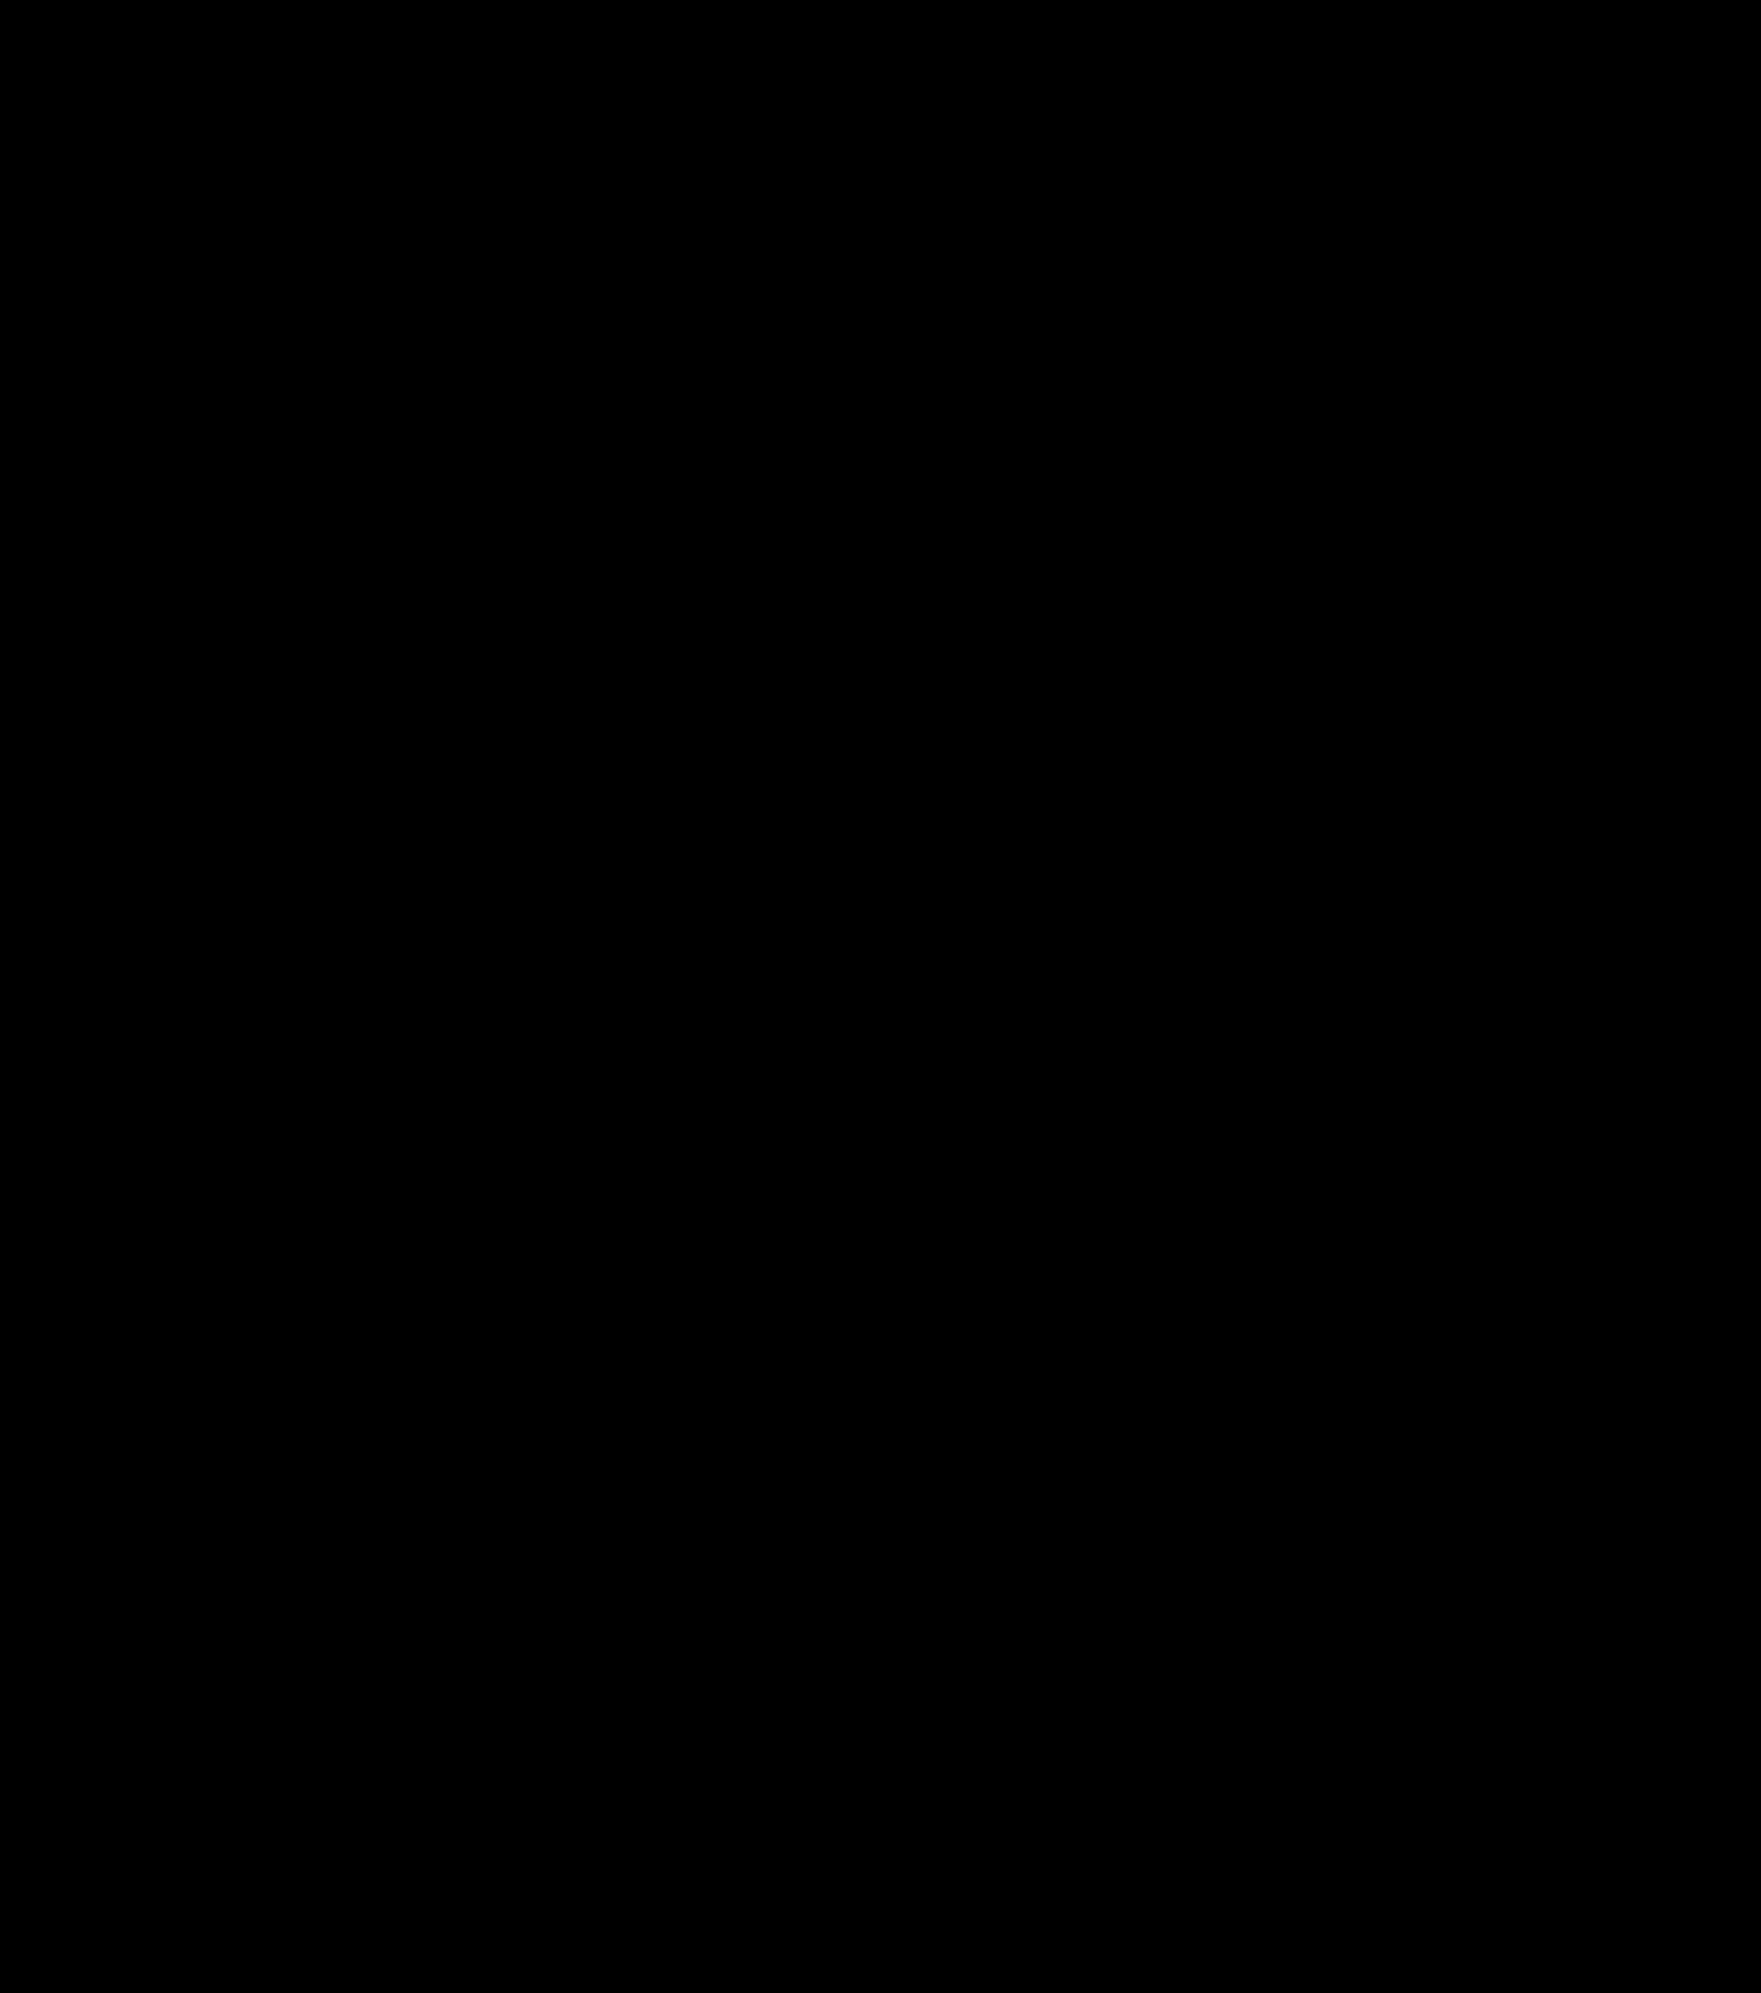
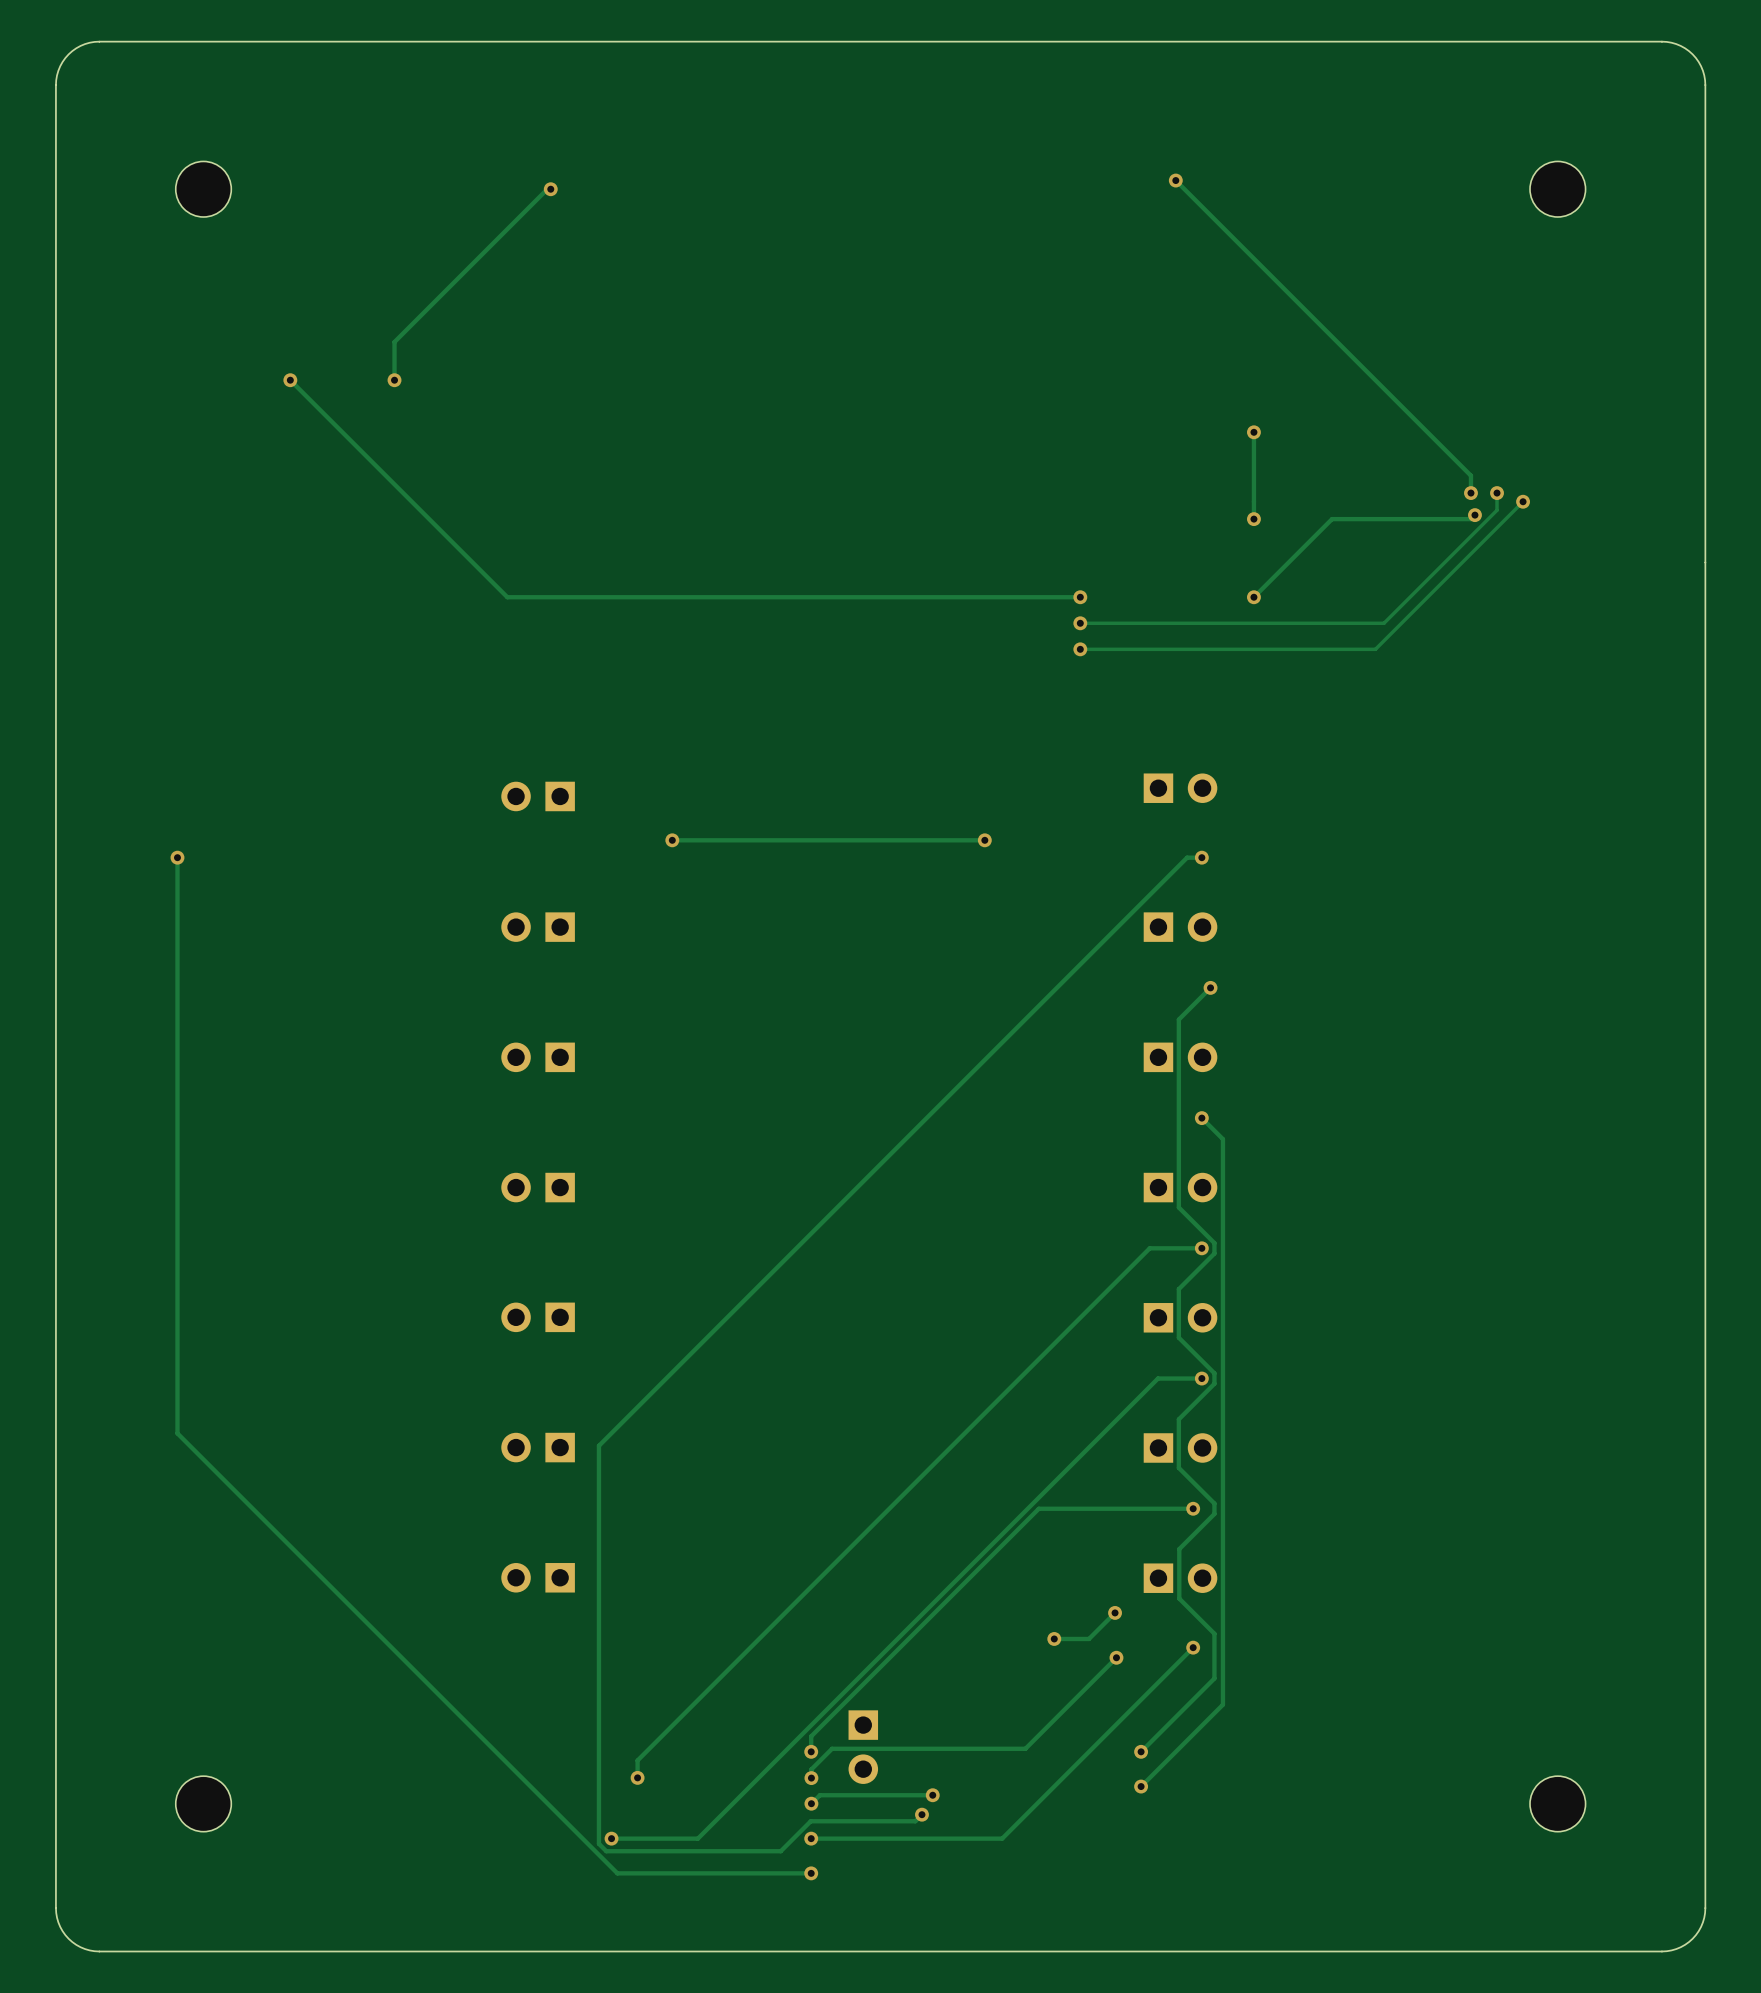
board edge: none -> (1661, 41) (99, 41) (80, 45) (65, 57) (58, 70) (55, 85) (55, 1908) (60, 1926) (72, 1942) (85, 1949) (99, 1951) (1661, 1951) (1680, 1947) (1695, 1935) (1702, 1922) (1705, 1908) (1705, 85) (1702, 70) (1692, 54) (1676, 44) (1661, 41)
track: none -> (1175, 180) (1470, 475) (1470, 493)
via: none -> (1175, 180)
part: none -> (203, 189)
track: none -> (550, 189) (547, 189) (394, 342) (394, 380)
via: none -> (550, 189)
part: none -> (1557, 189)
track: none -> (290, 380) (507, 597) (1080, 597)
via: none -> (290, 380)
via: none -> (394, 380)
track: none -> (1253, 432) (1253, 519)
via: none -> (1253, 432)
via: none -> (1470, 493)
track: none -> (1497, 493) (1497, 510) (1383, 623) (1080, 623)
via: none -> (1497, 493)
track: none -> (1523, 501) (1375, 649) (1080, 649)
via: none -> (1523, 501)
track: none -> (1474, 515) (1470, 519) (1332, 519) (1253, 597)
via: none -> (1474, 515)
via: none -> (1253, 519)
via: none -> (1080, 597)
via: none -> (1253, 597)
via: none -> (1080, 623)
via: none -> (1080, 649)
part: none -> (1180, 788)
part: none -> (538, 796)
via: none -> (672, 840)
track: none -> (984, 840) (672, 840)
via: none -> (984, 840)
track: none -> (177, 857) (177, 1433) (617, 1873) (811, 1873)
via: none -> (177, 857)
track: none -> (1201, 857) (1187, 857) (598, 1445) (598, 1843) (606, 1851) (780, 1851) (810, 1821) (915, 1821) (921, 1814)
via: none -> (1201, 857)
part: none -> (538, 927)
part: none -> (1180, 927)
track: none -> (1210, 987) (1178, 1019) (1178, 1207) (1214, 1243) (1214, 1253) (1178, 1289) (1178, 1337) (1214, 1373) (1214, 1383) (1178, 1419) (1178, 1467) (1214, 1503) (1214, 1513) (1179, 1549) (1179, 1598) (1214, 1633) (1214, 1678) (1141, 1751)
via: none -> (1210, 987)
part: none -> (538, 1057)
part: none -> (1180, 1057)
track: none -> (1201, 1118) (1222, 1139) (1222, 1704) (1141, 1786)
via: none -> (1201, 1118)
part: none -> (538, 1187)
part: none -> (1180, 1187)
track: none -> (1201, 1248) (1149, 1248) (637, 1760) (637, 1777)
via: none -> (1201, 1248)
part: none -> (538, 1317)
part: none -> (1180, 1317)
track: none -> (1201, 1378) (1157, 1378) (697, 1838) (611, 1838)
via: none -> (1201, 1378)
part: none -> (538, 1447)
part: none -> (1180, 1447)
track: none -> (1193, 1508) (1038, 1508) (811, 1736) (811, 1751)
via: none -> (1193, 1508)
part: none -> (538, 1577)
part: none -> (1180, 1578)
track: none -> (1115, 1612) (1089, 1638) (1054, 1638)
via: none -> (1115, 1612)
via: none -> (1054, 1638)
track: none -> (1193, 1647) (1002, 1838) (811, 1838)
via: none -> (1193, 1647)
track: none -> (1116, 1657) (1025, 1748) (832, 1748) (811, 1769) (811, 1778)
via: none -> (1116, 1657)
part: none -> (863, 1747)
via: none -> (811, 1751)
via: none -> (1141, 1751)
via: none -> (637, 1777)
via: none -> (811, 1778)
via: none -> (1141, 1786)
track: none -> (932, 1795) (819, 1795) (811, 1803)
via: none -> (932, 1795)
part: none -> (203, 1803)
via: none -> (811, 1803)
part: none -> (1557, 1803)
via: none -> (921, 1814)
via: none -> (611, 1838)
via: none -> (811, 1838)
via: none -> (811, 1873)

